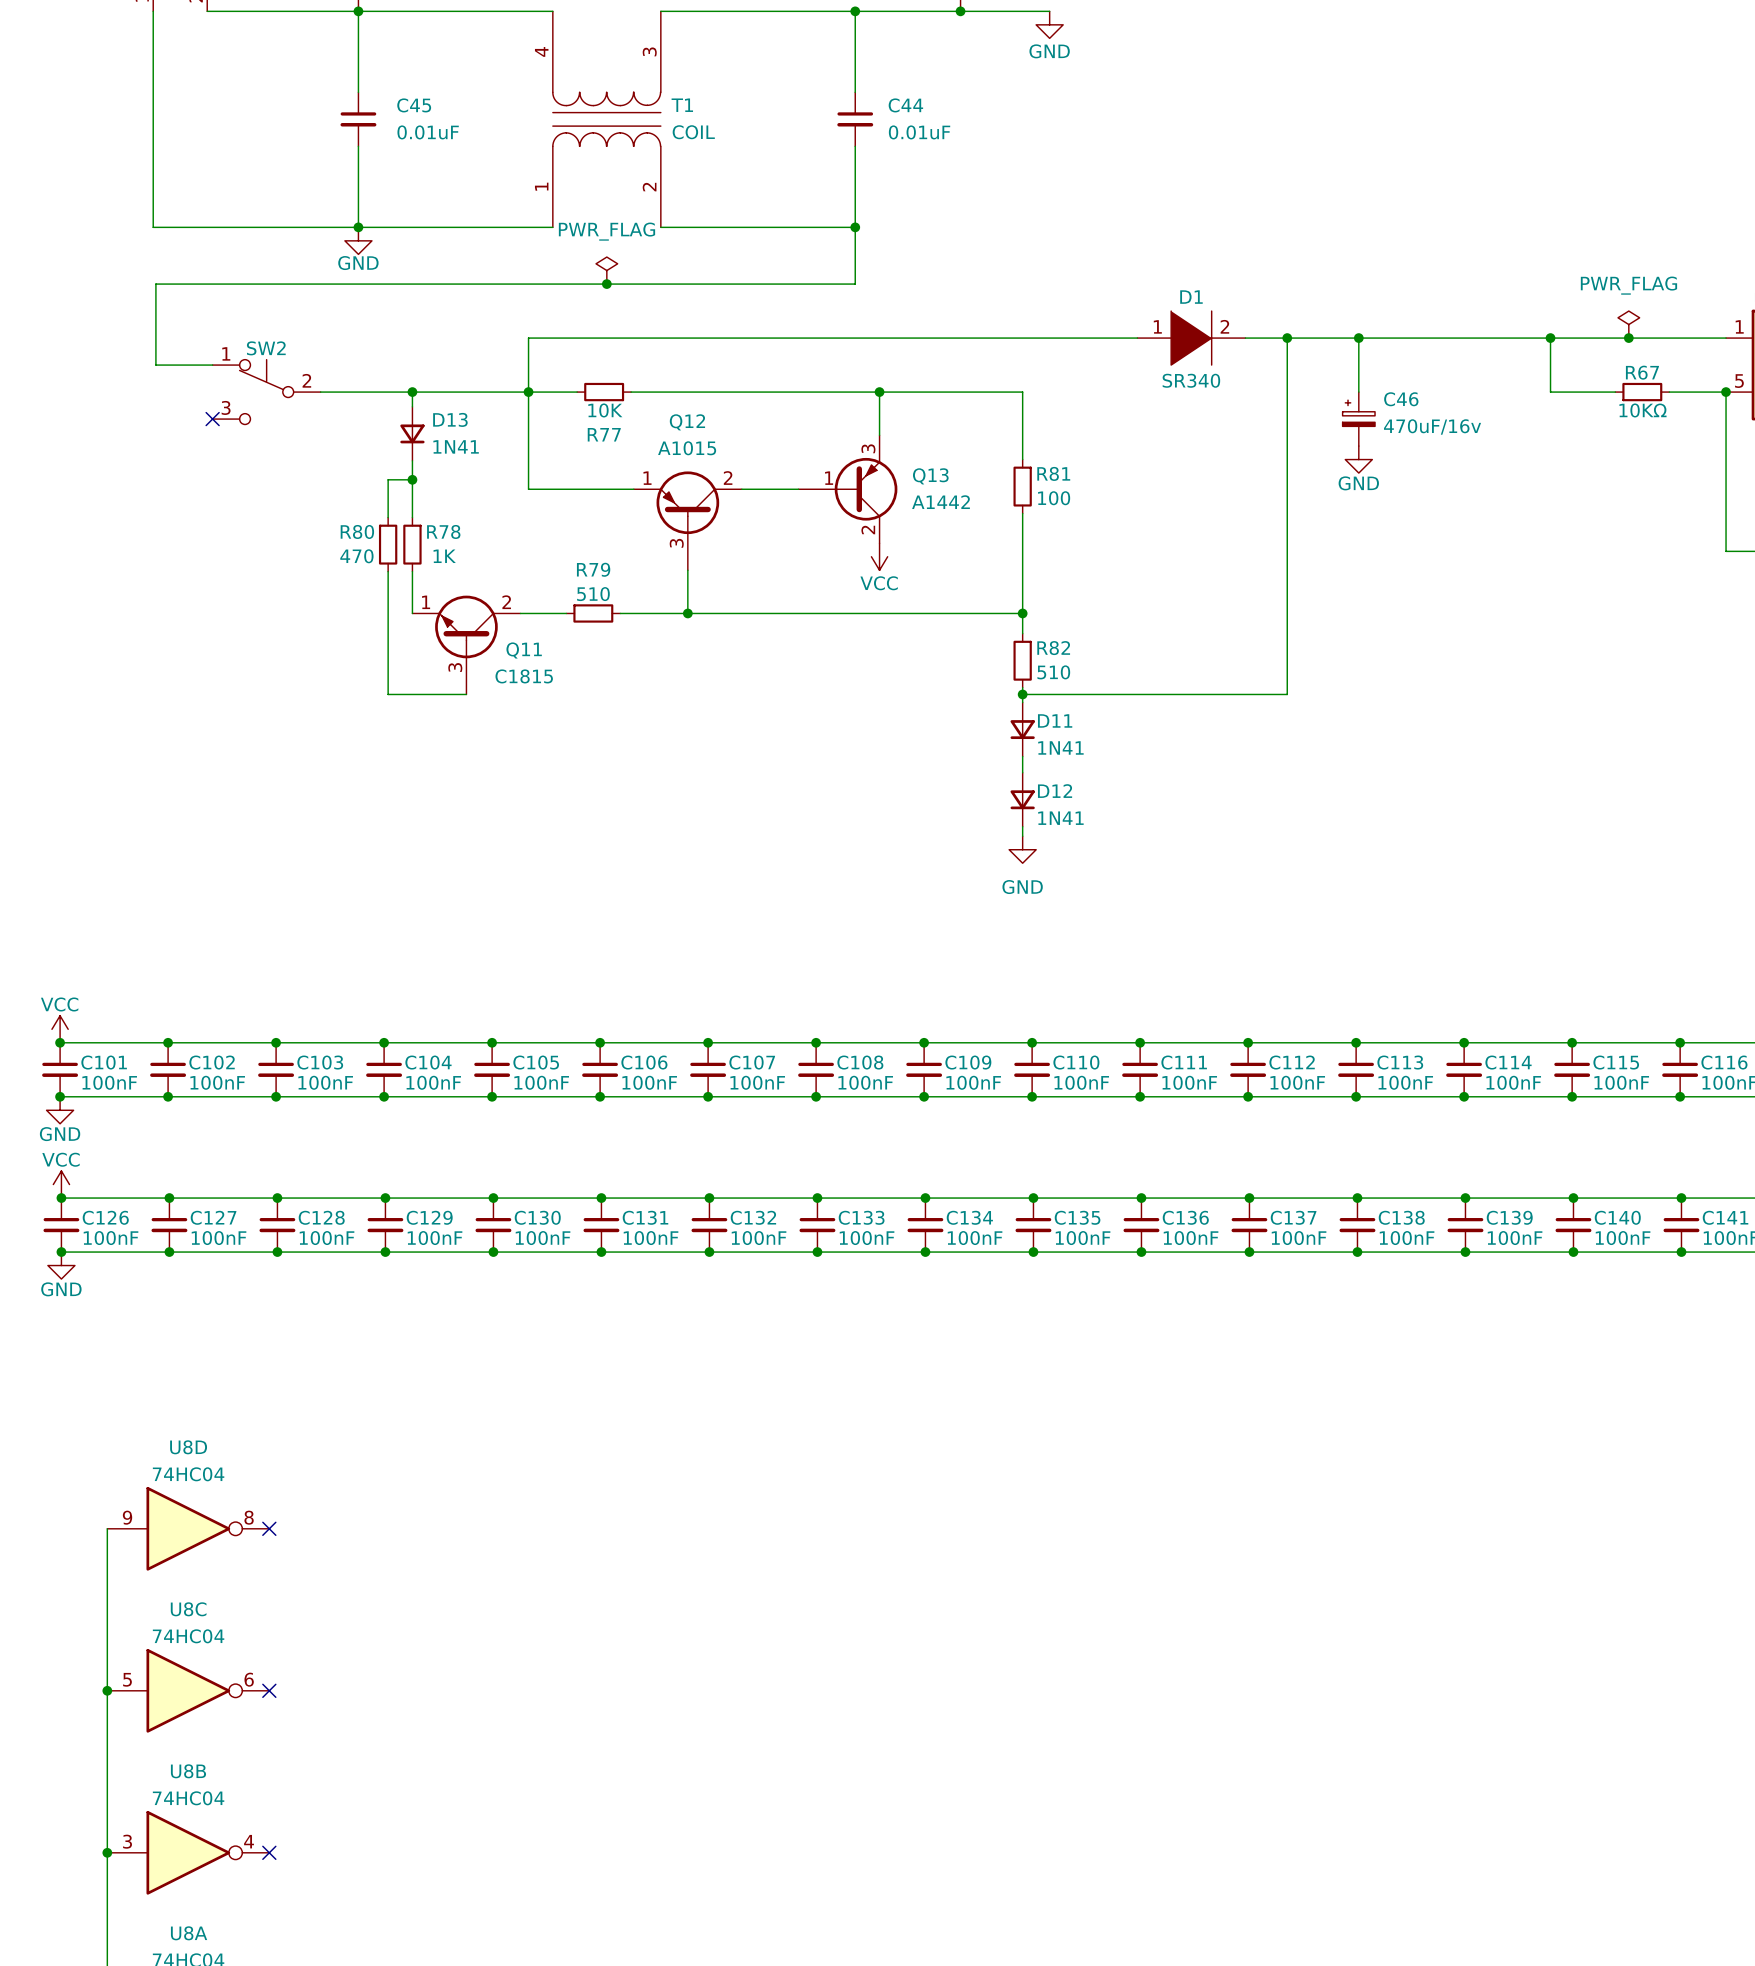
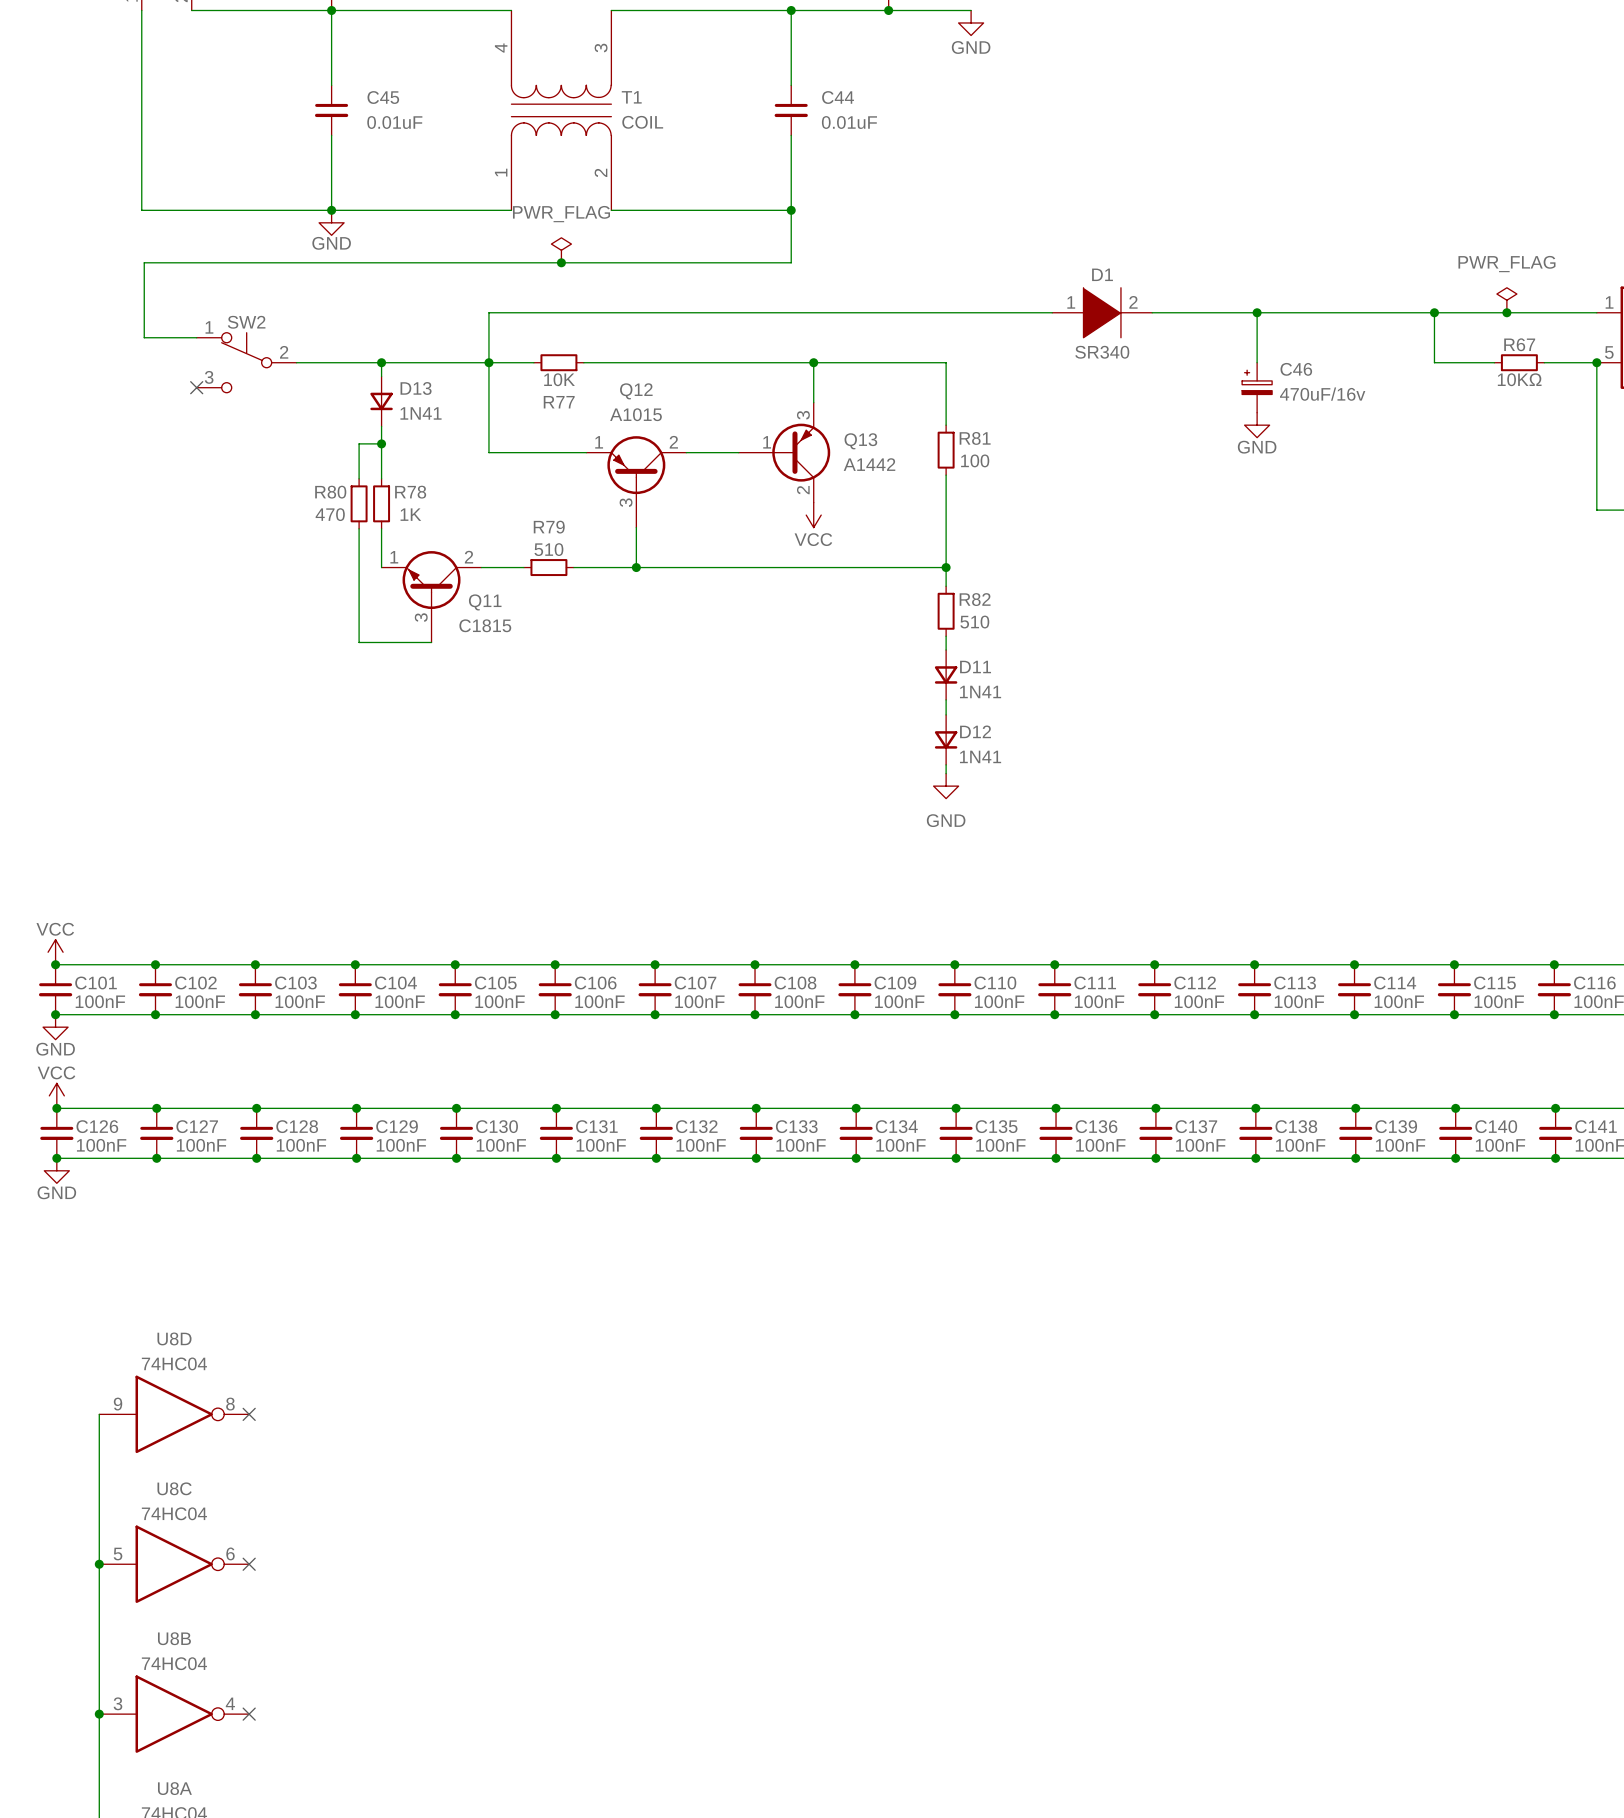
wire: (1287, 338) (1287, 694) (1022, 694) -> none
junction: (1287, 338) -> none
junction: (1022, 694) -> none

